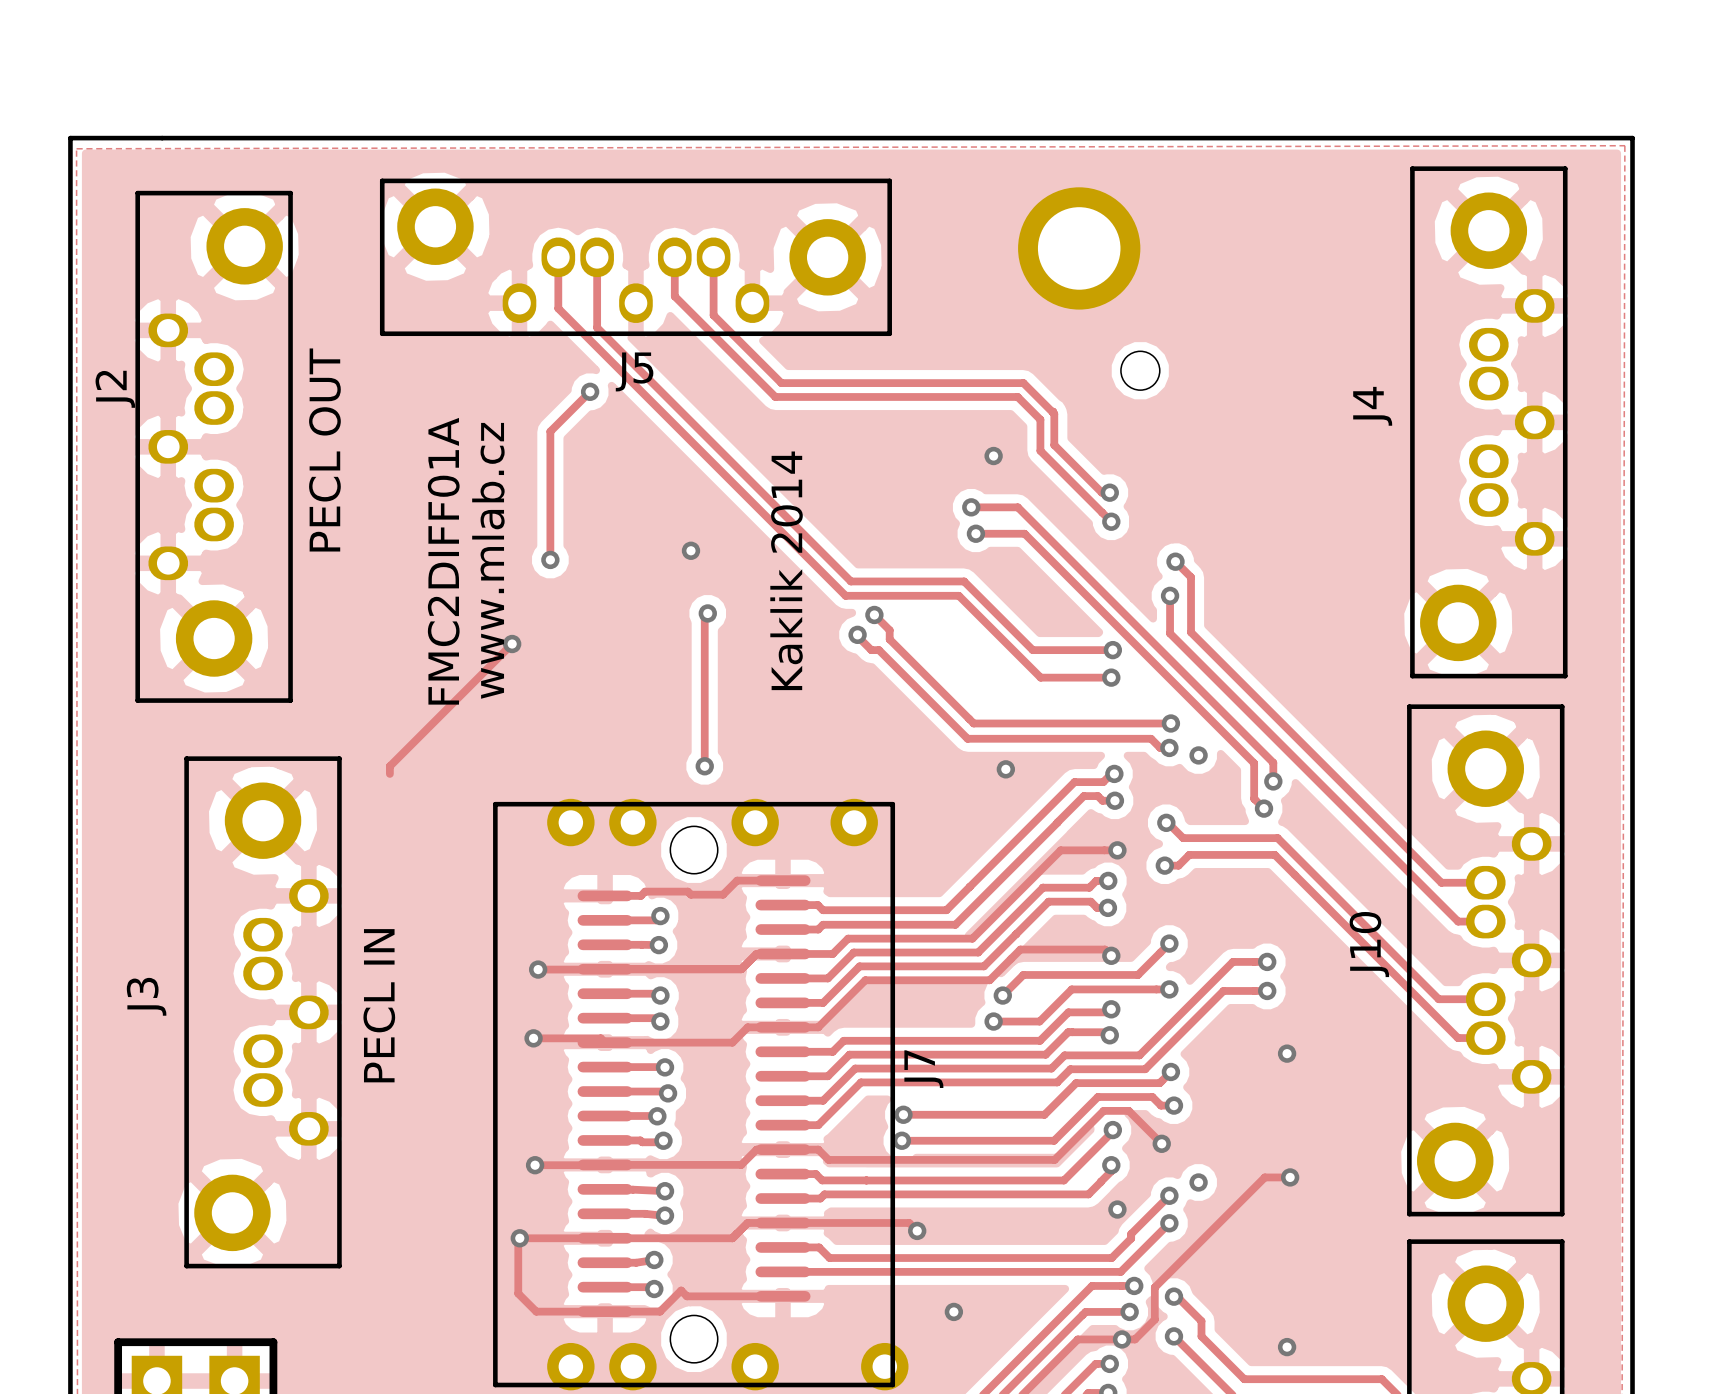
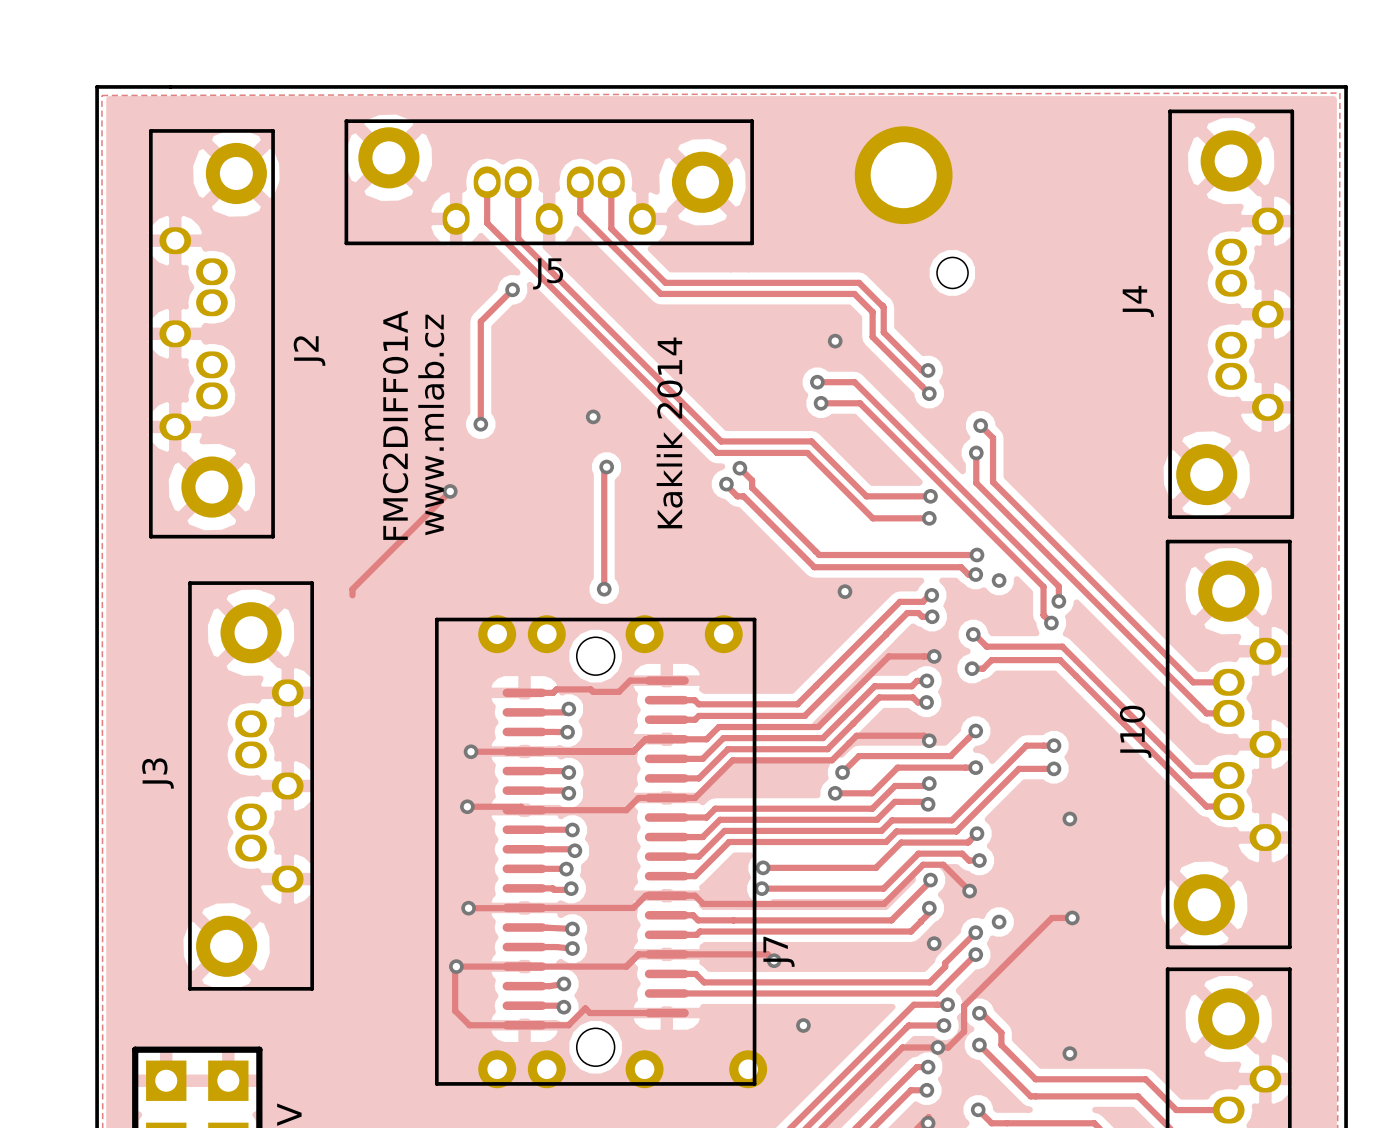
J2 name position: J2 (115, 389) -> J2 (309, 351)
text: PECL OUT (324, 449) -> none
text: PECL IN (379, 1005) -> none
J7 name position: J7 (923, 1069) -> J7 (778, 951)

